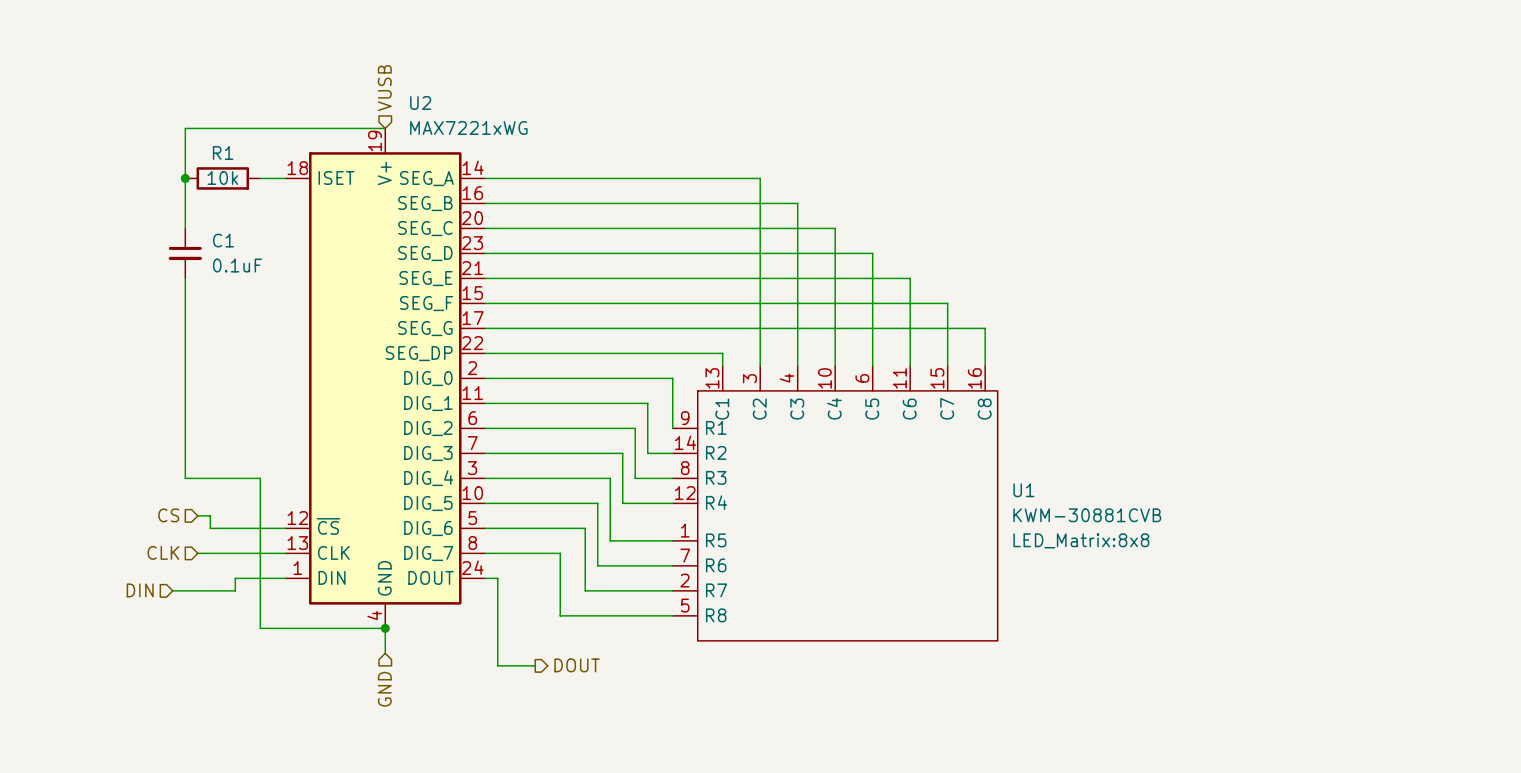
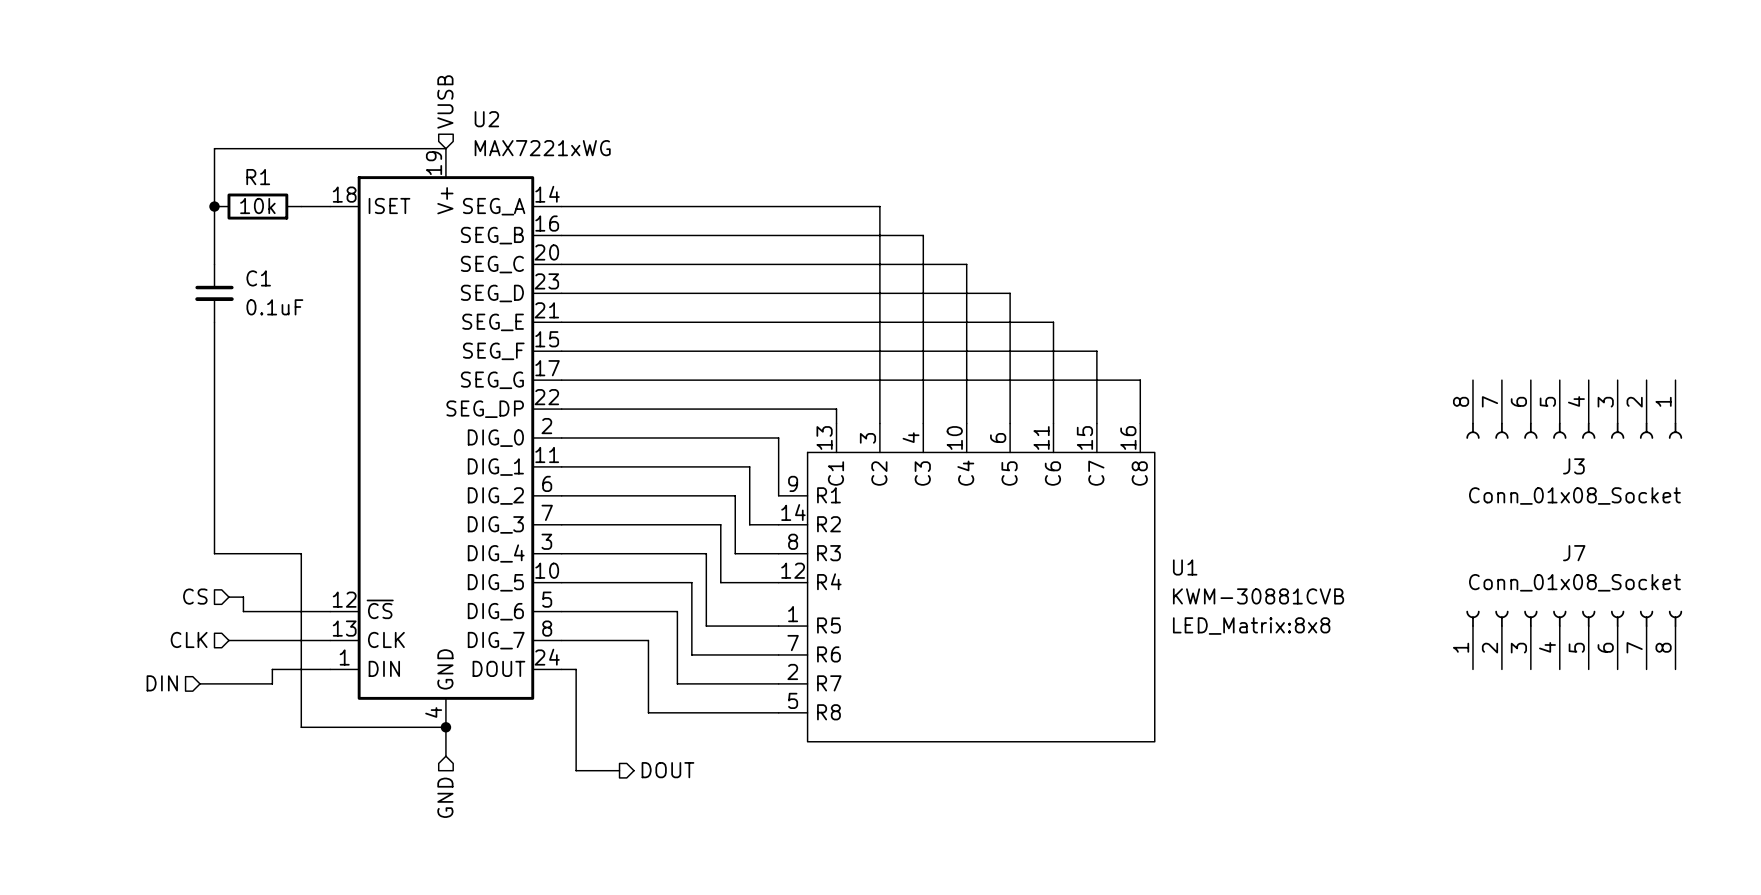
J3: none -> Conn_01x08_Socket (1574, 409)
J7: none -> Conn_01x08_Socket (1574, 640)

